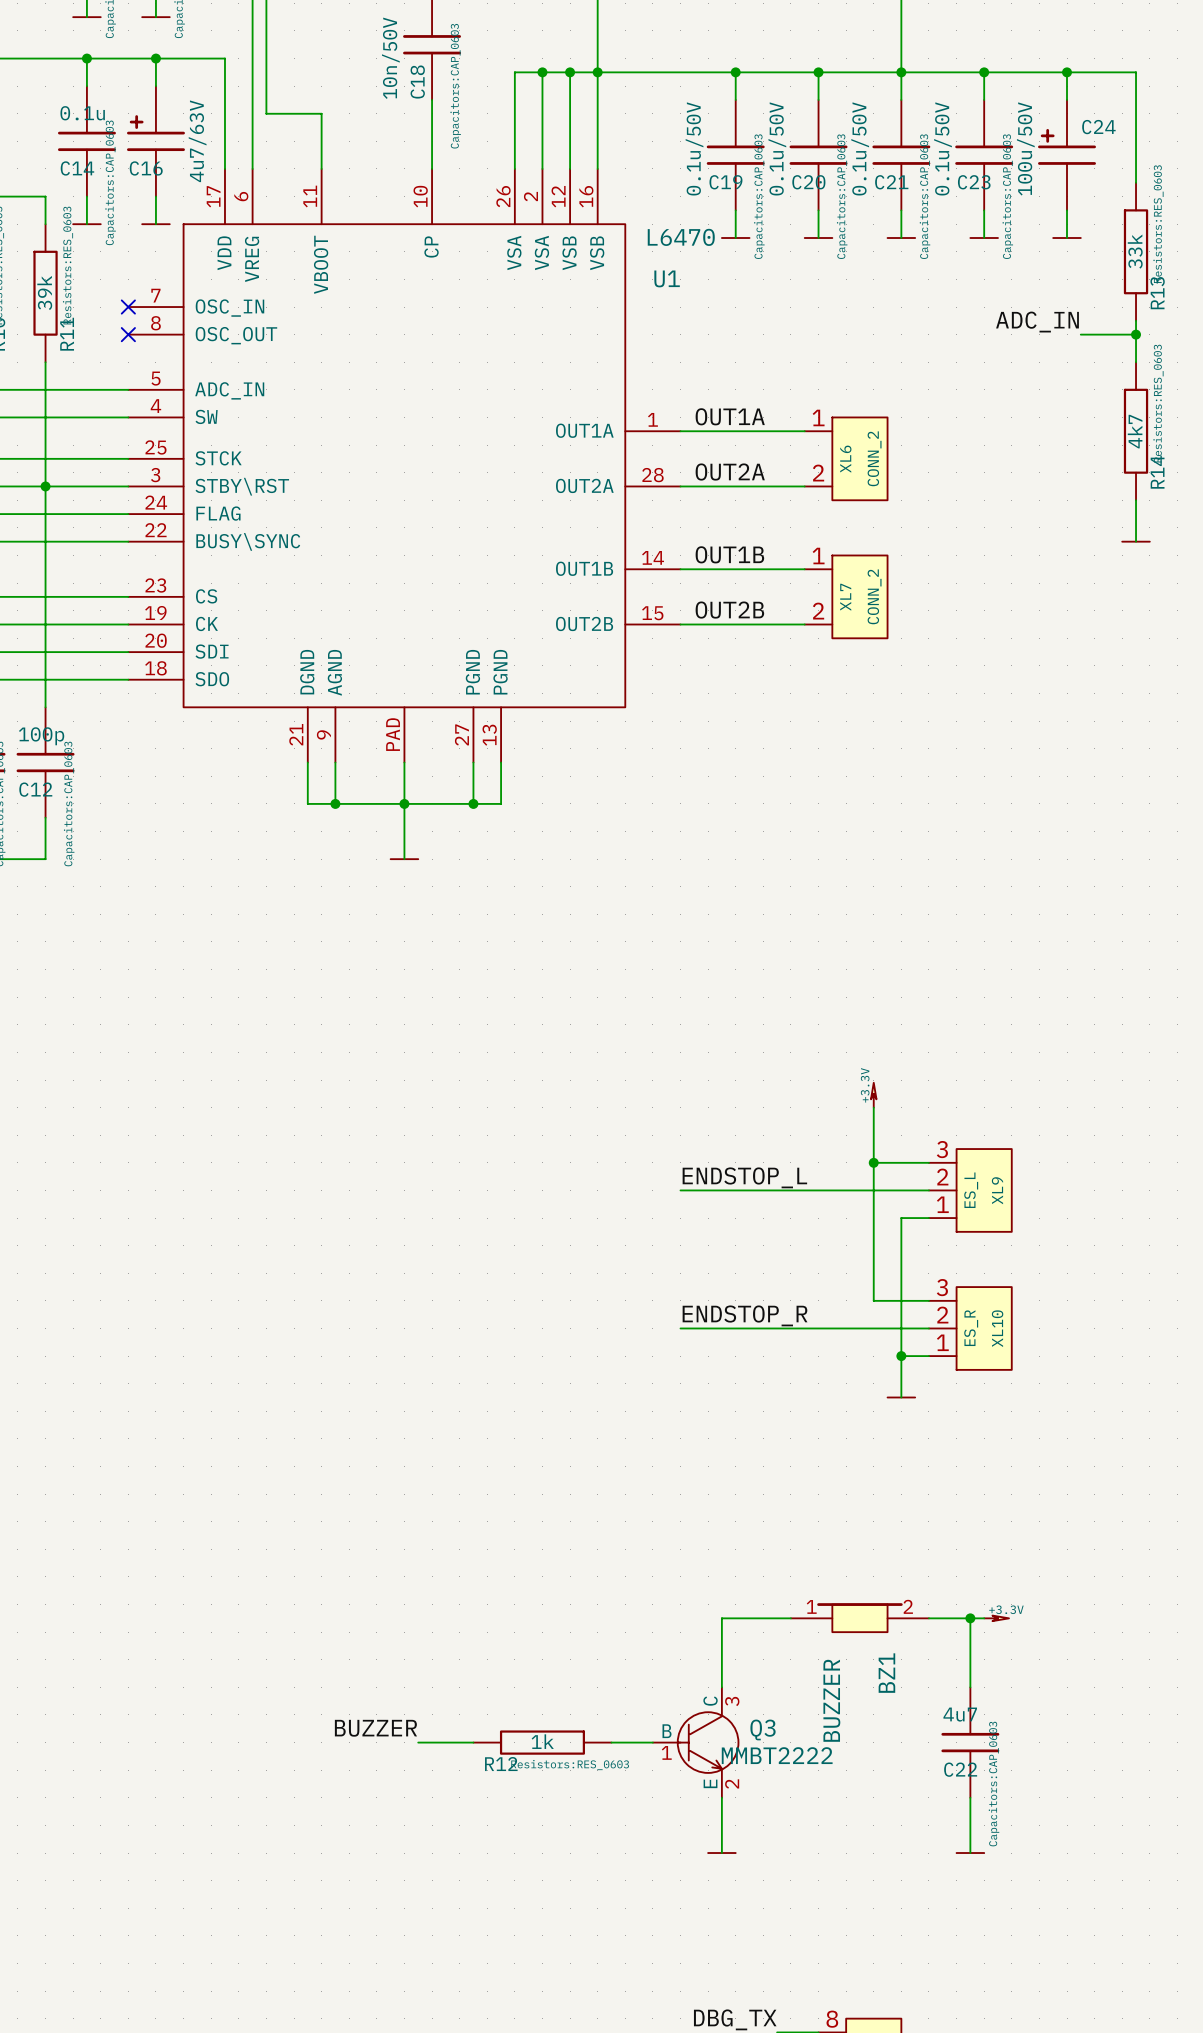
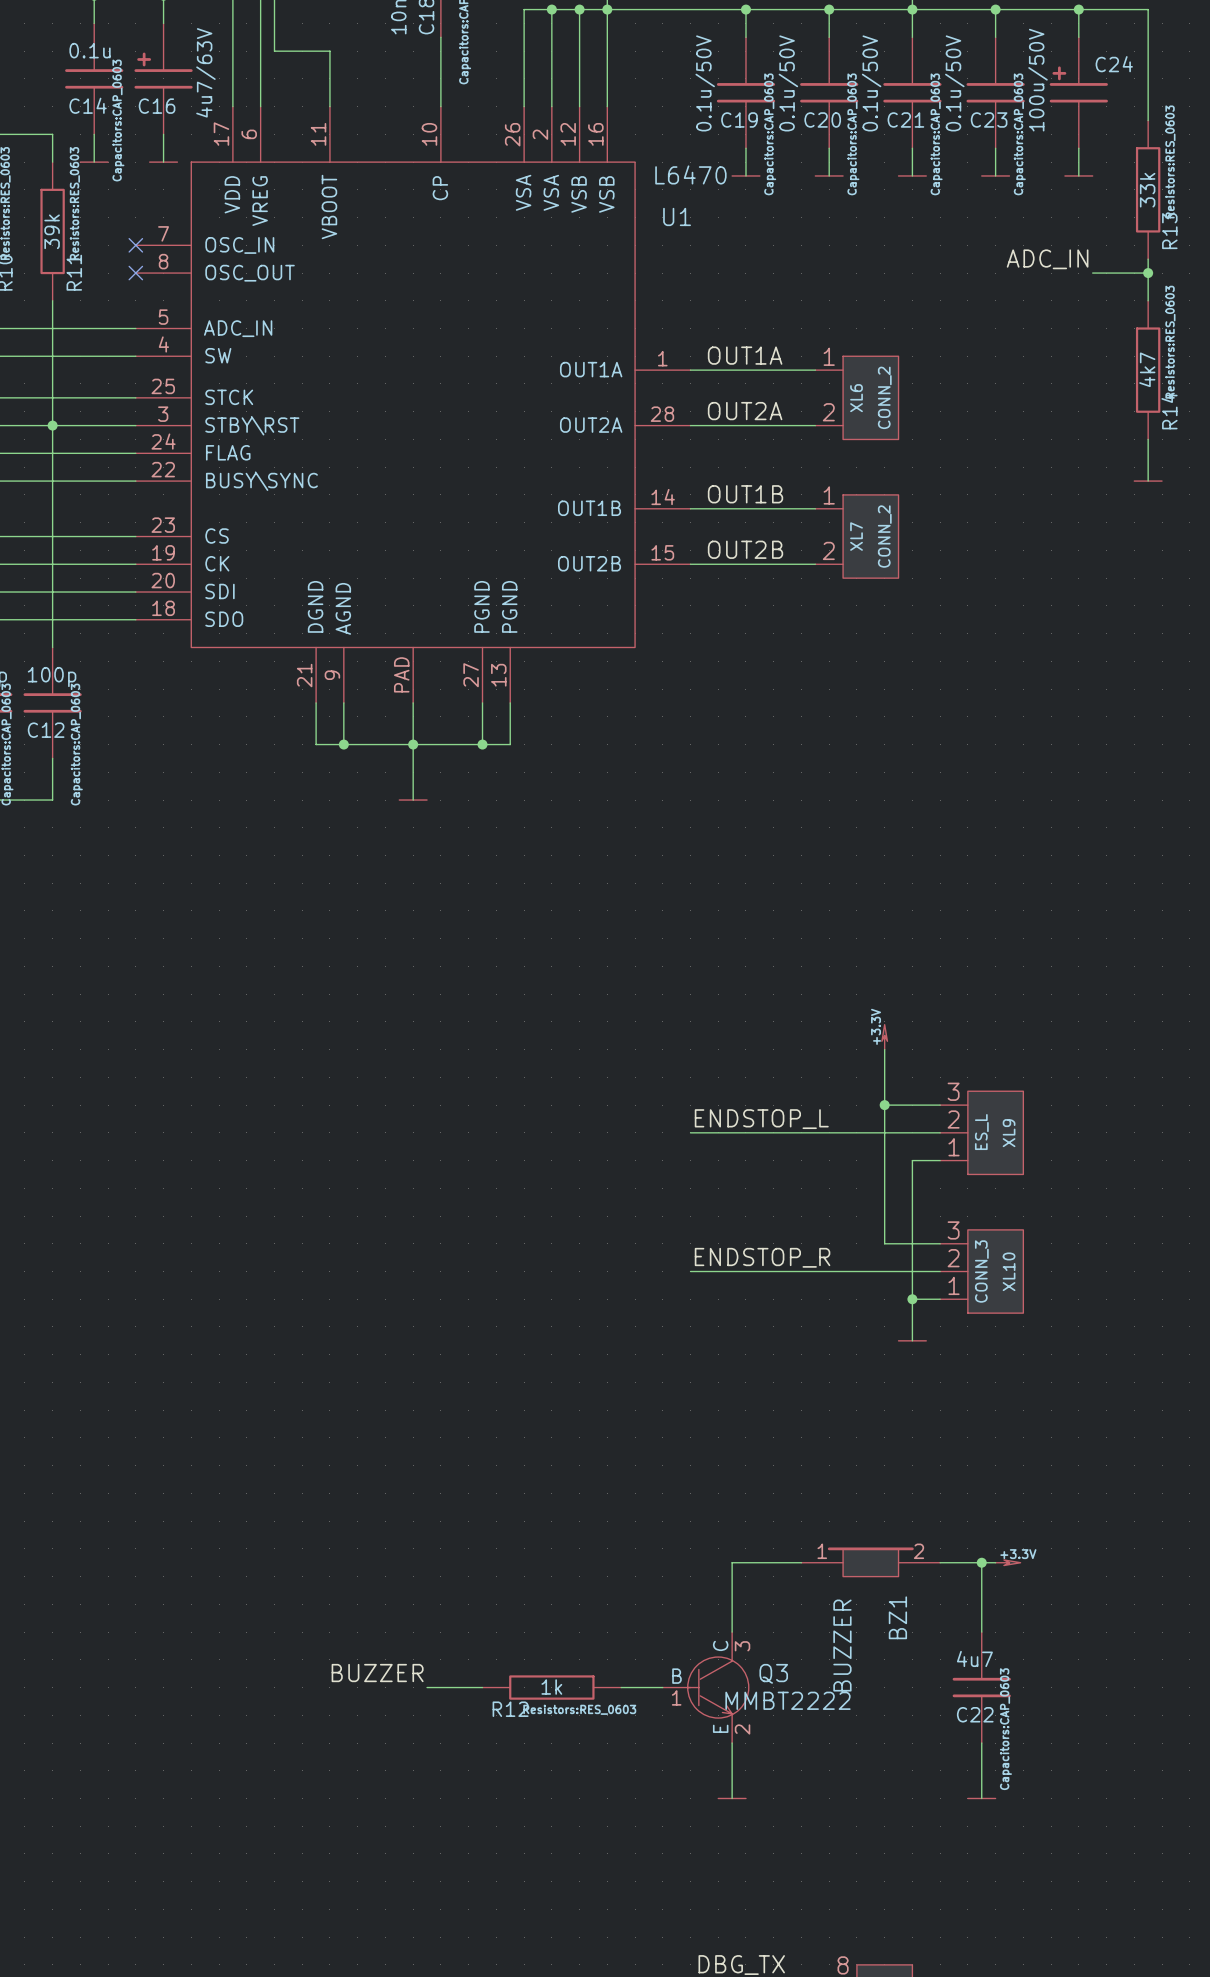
XL10 value: ES_R (971, 1328) -> CONN_3 (981, 1271)

